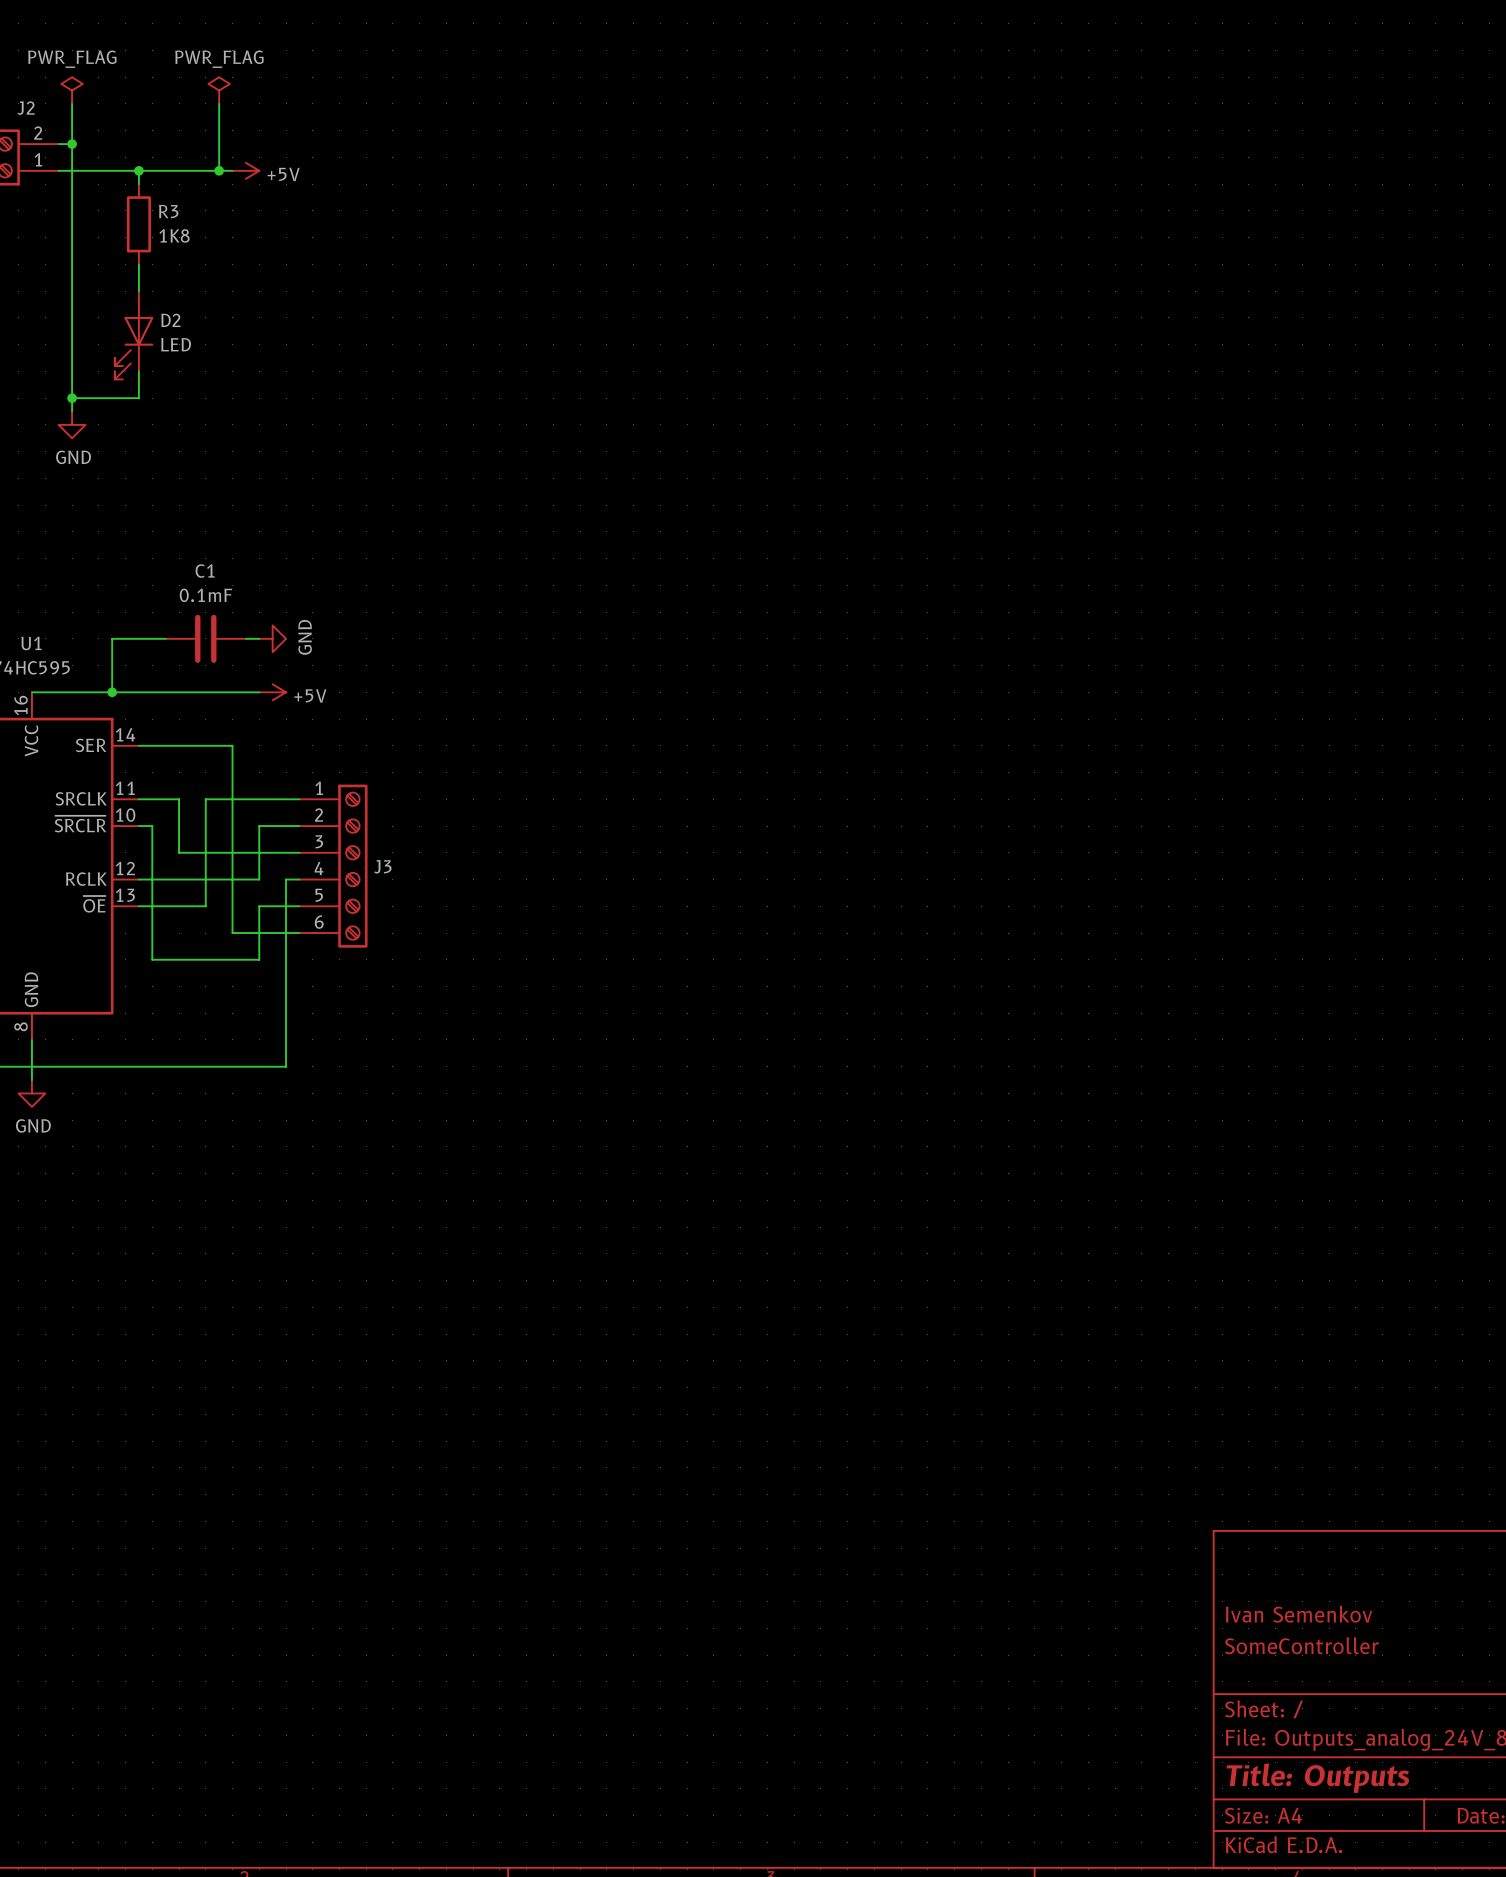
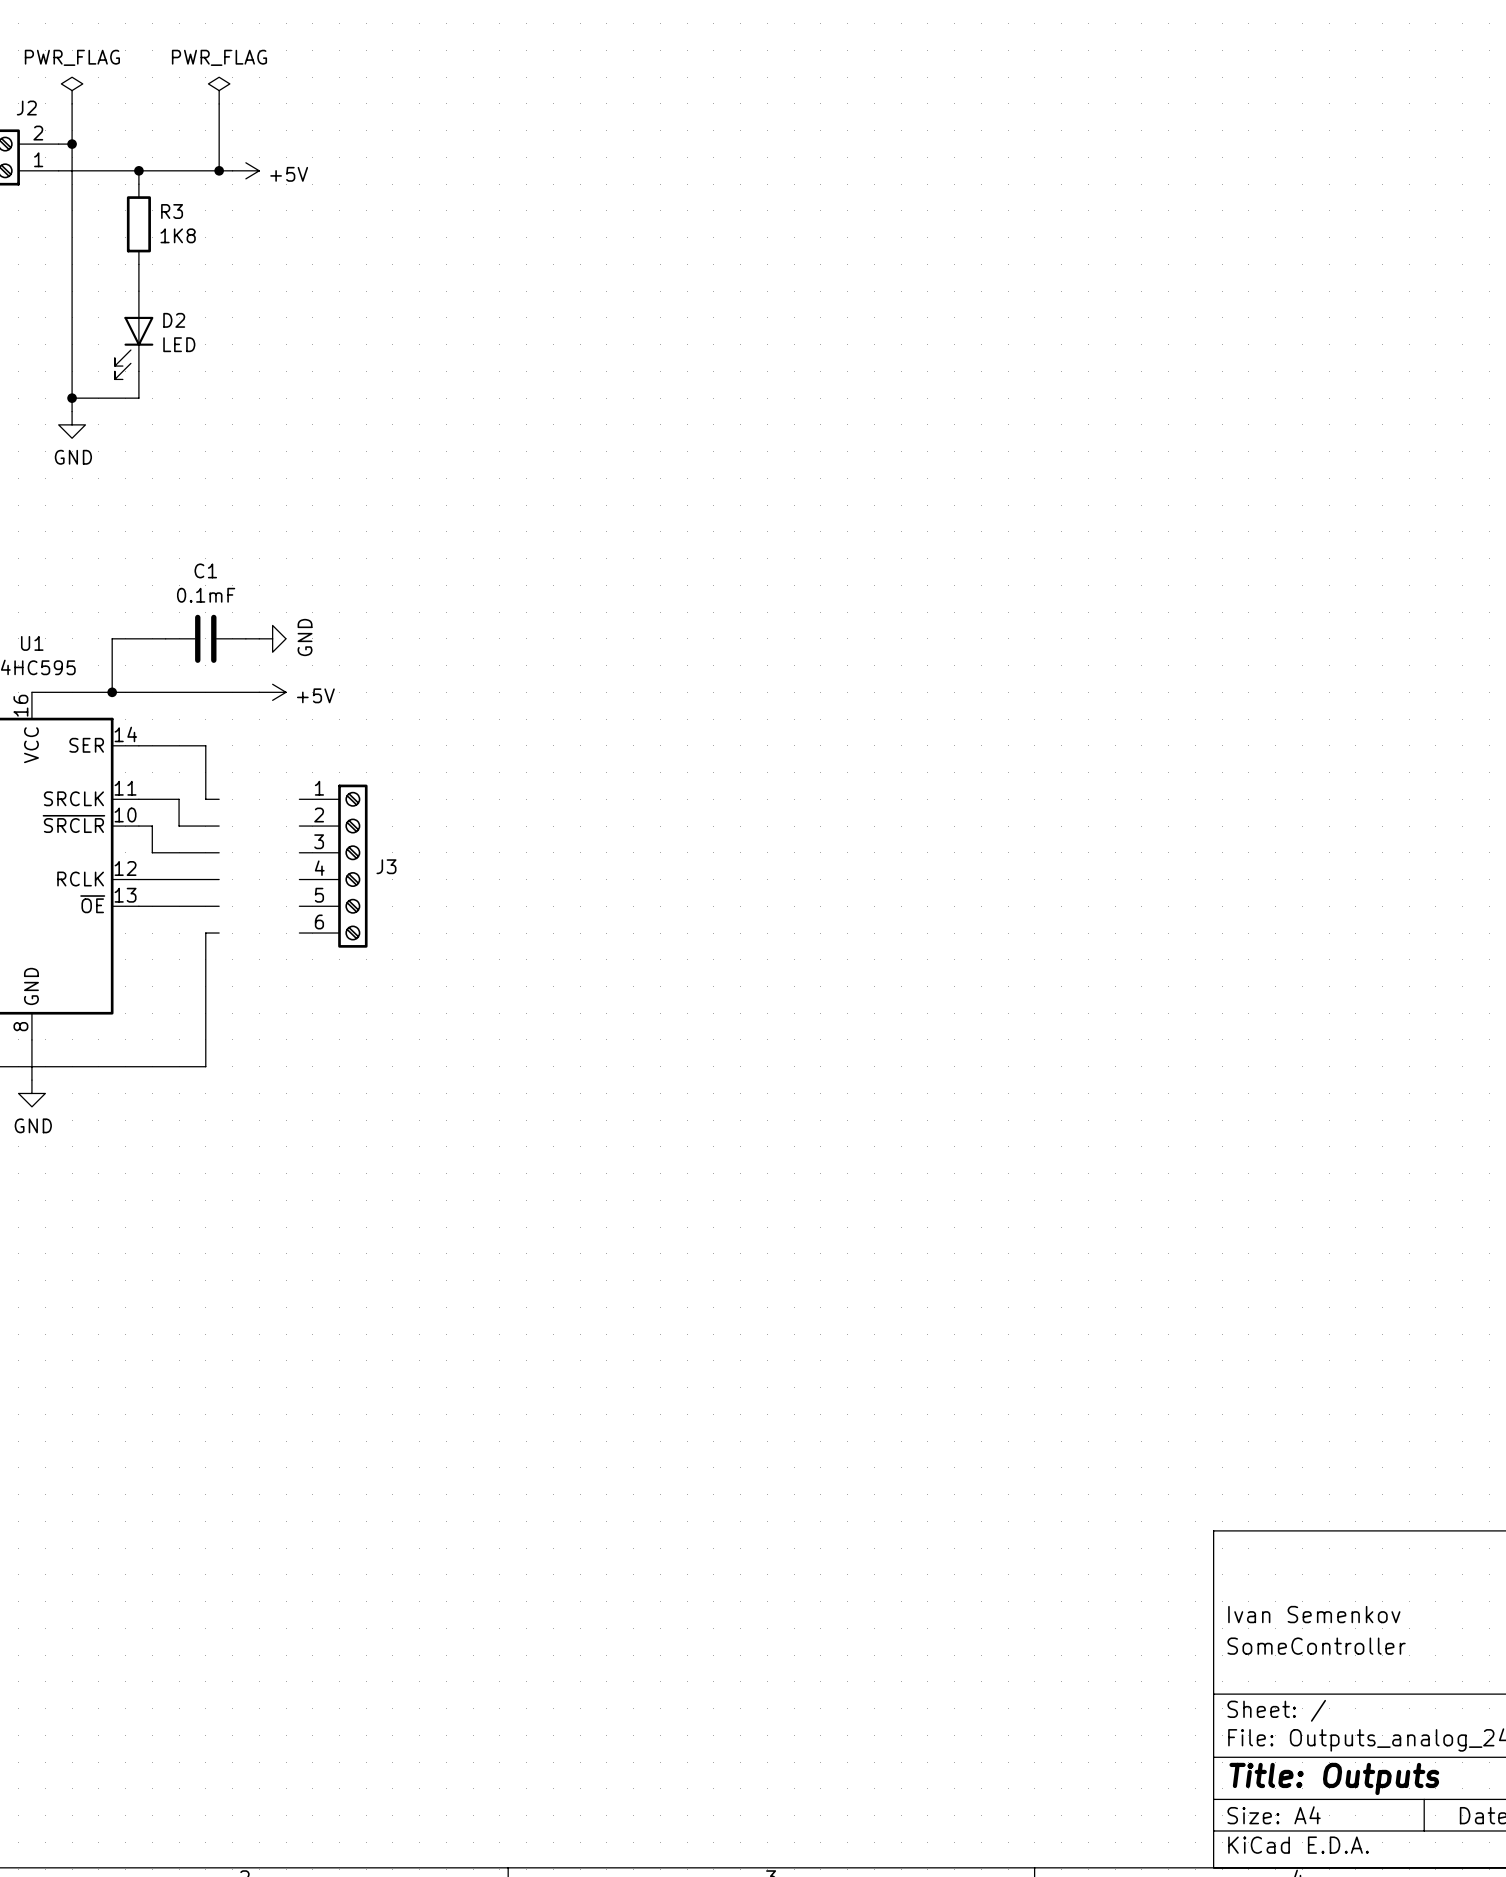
wire: (205, 745) (232, 745) (232, 933) (299, 933) -> (205, 745) (205, 799)
wire: (205, 799) (205, 906) -> (219, 906) (205, 906)
wire: (219, 799) (299, 799) -> none
wire: (179, 826) (179, 852) -> (152, 852) (179, 852)
wire: none -> (179, 826) (219, 826)
wire: (299, 826) (259, 826) (259, 879) (219, 879) -> none
wire: (152, 852) (152, 959) (259, 959) (259, 906) (299, 906) -> none
wire: (219, 852) (299, 852) -> none
wire: (299, 879) (286, 879) (286, 1066) (205, 1066) -> (219, 933) (205, 933) (205, 1066)

